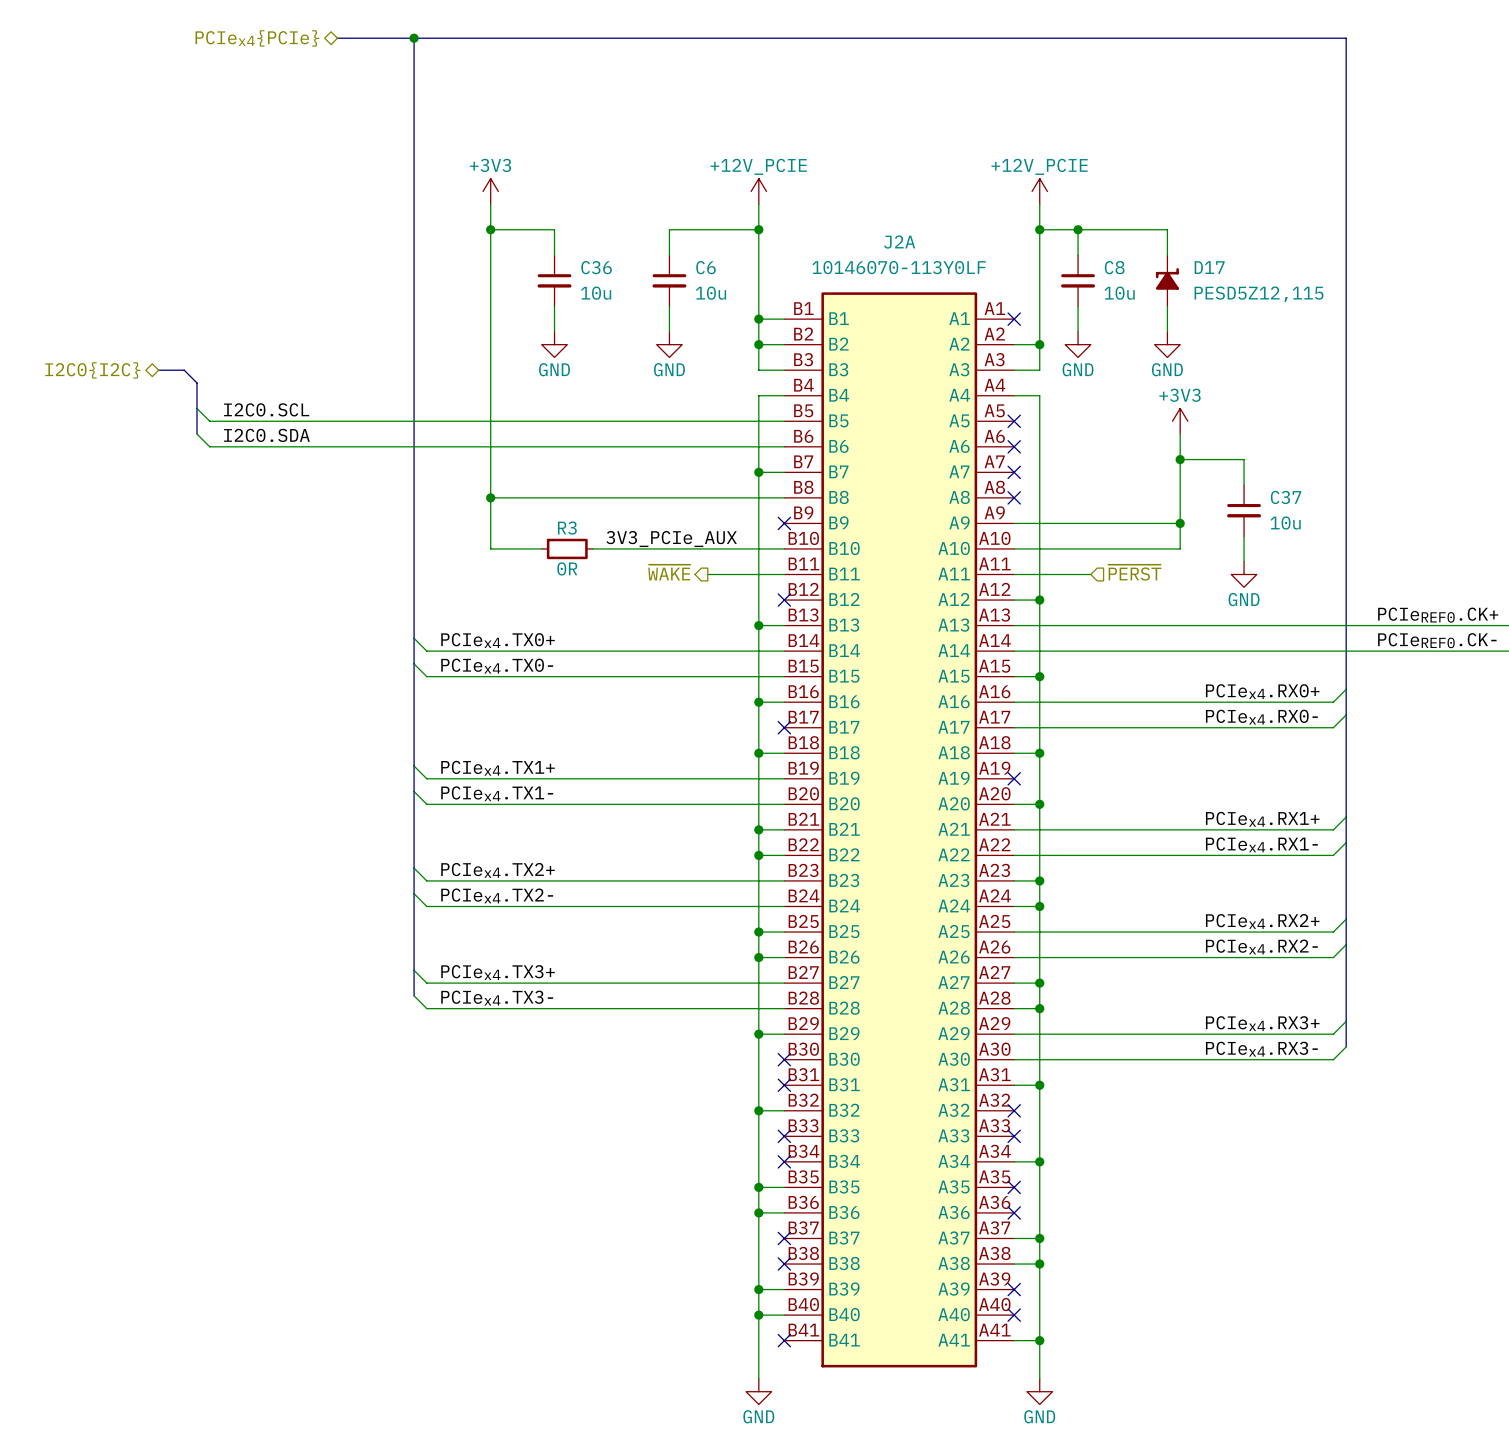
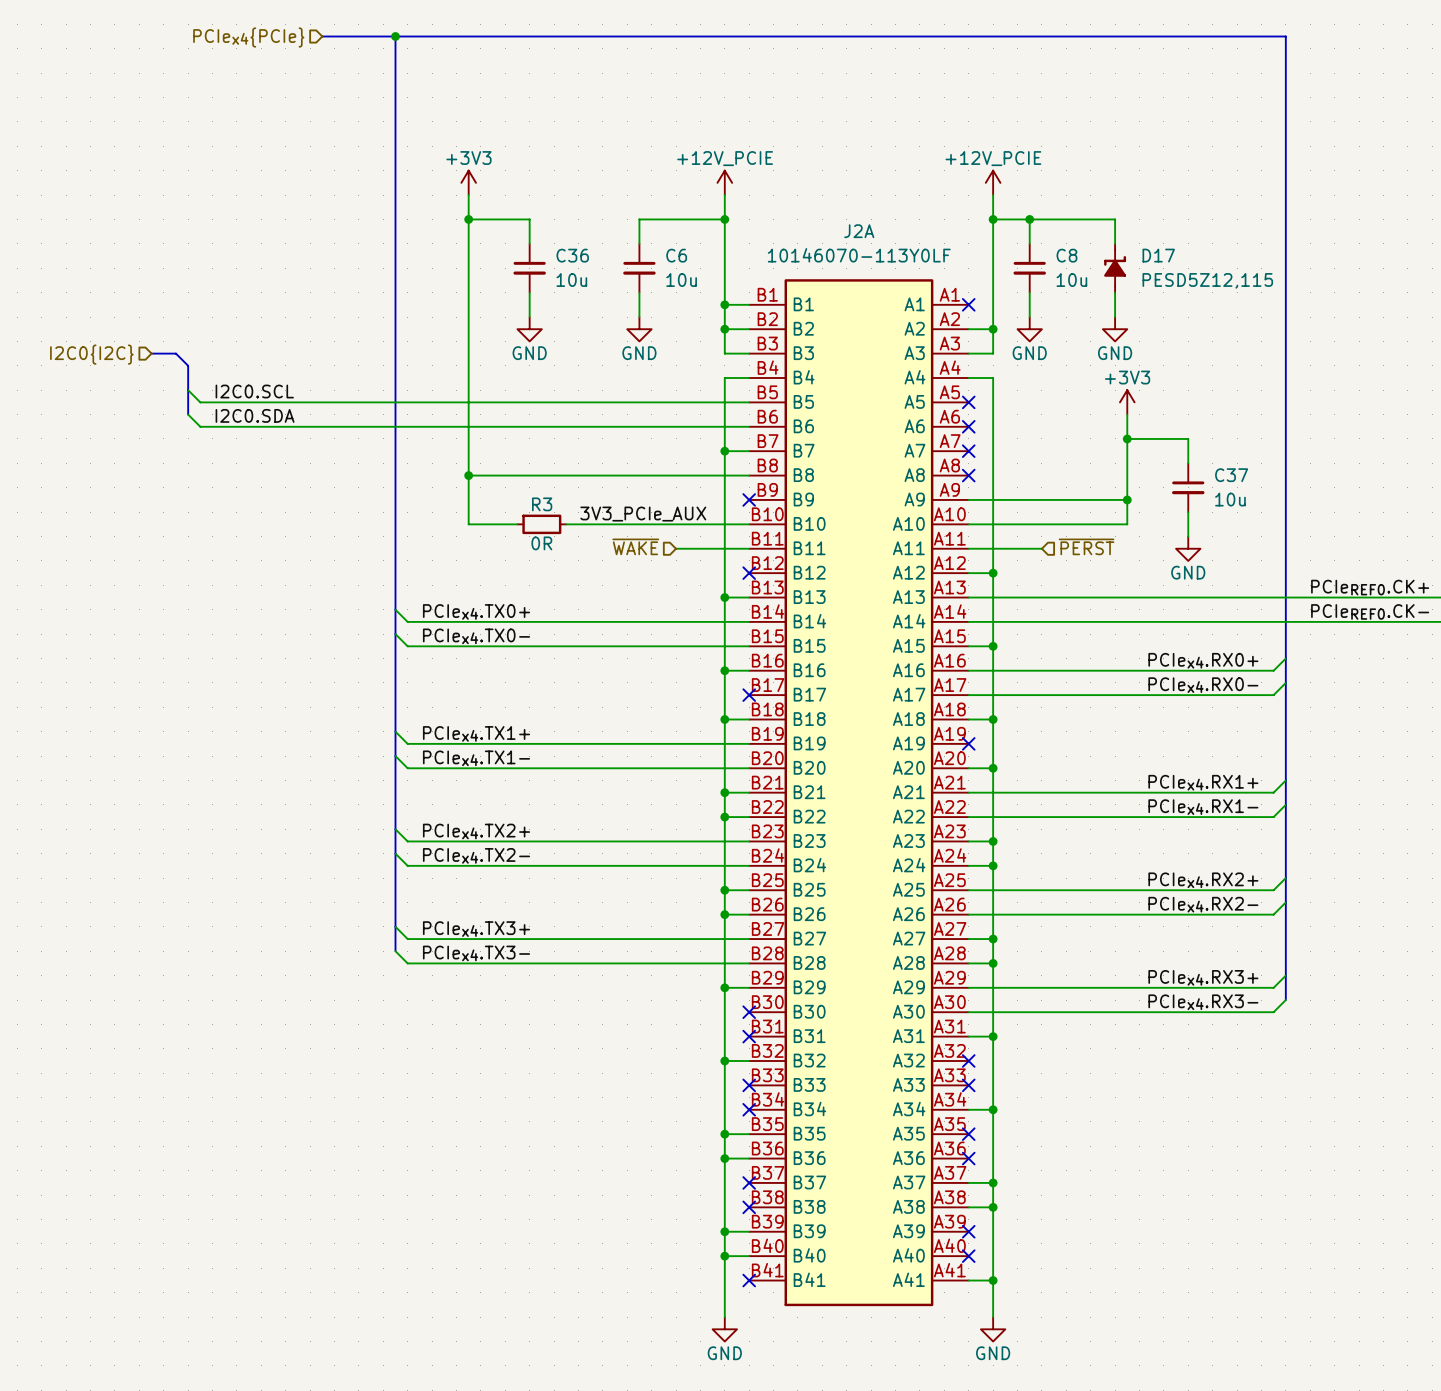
hierarchical label shape: bidirectional (257, 38) -> input (248, 37)
hierarchical label shape: bidirectional (92, 370) -> input (91, 354)
hierarchical label shape: output (669, 572) -> input (635, 546)

